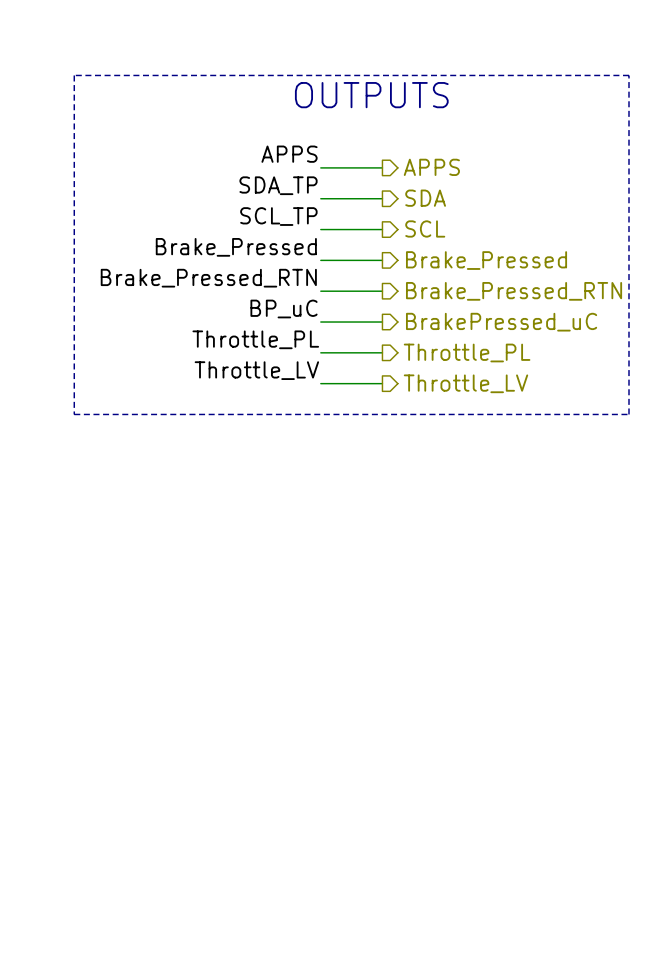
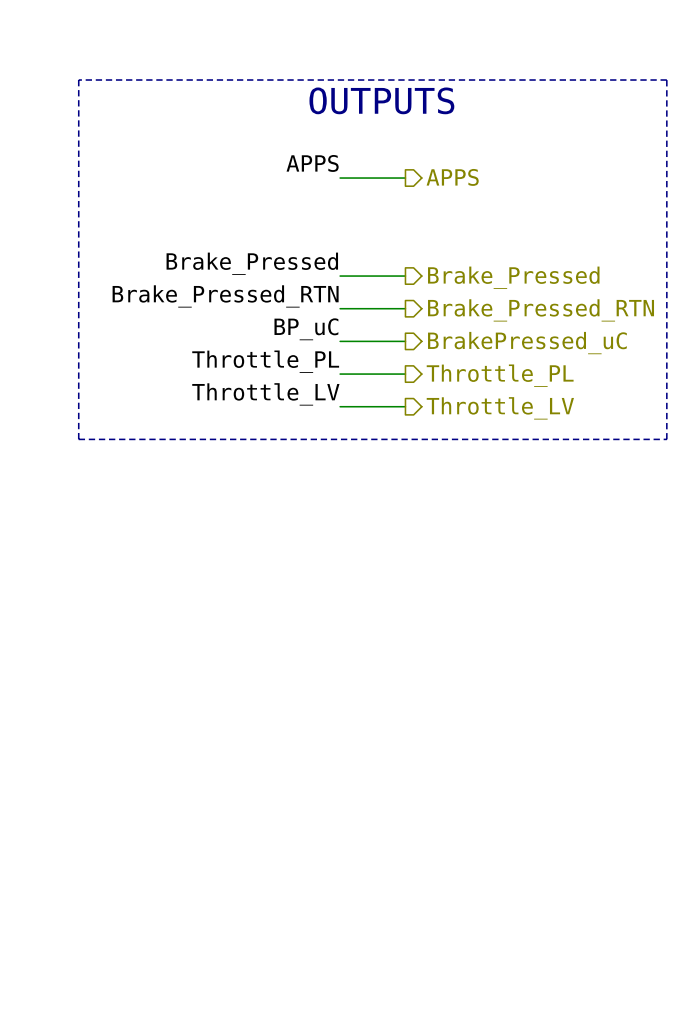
label: SDA_TP (278, 185) -> none
wire: (320, 198) (382, 198) -> none
hierarchical label: SDA (425, 198) -> none
label: SCL_TP (278, 216) -> none
hierarchical label: SCL (425, 228) -> none
wire: (320, 229) (382, 229) -> none

